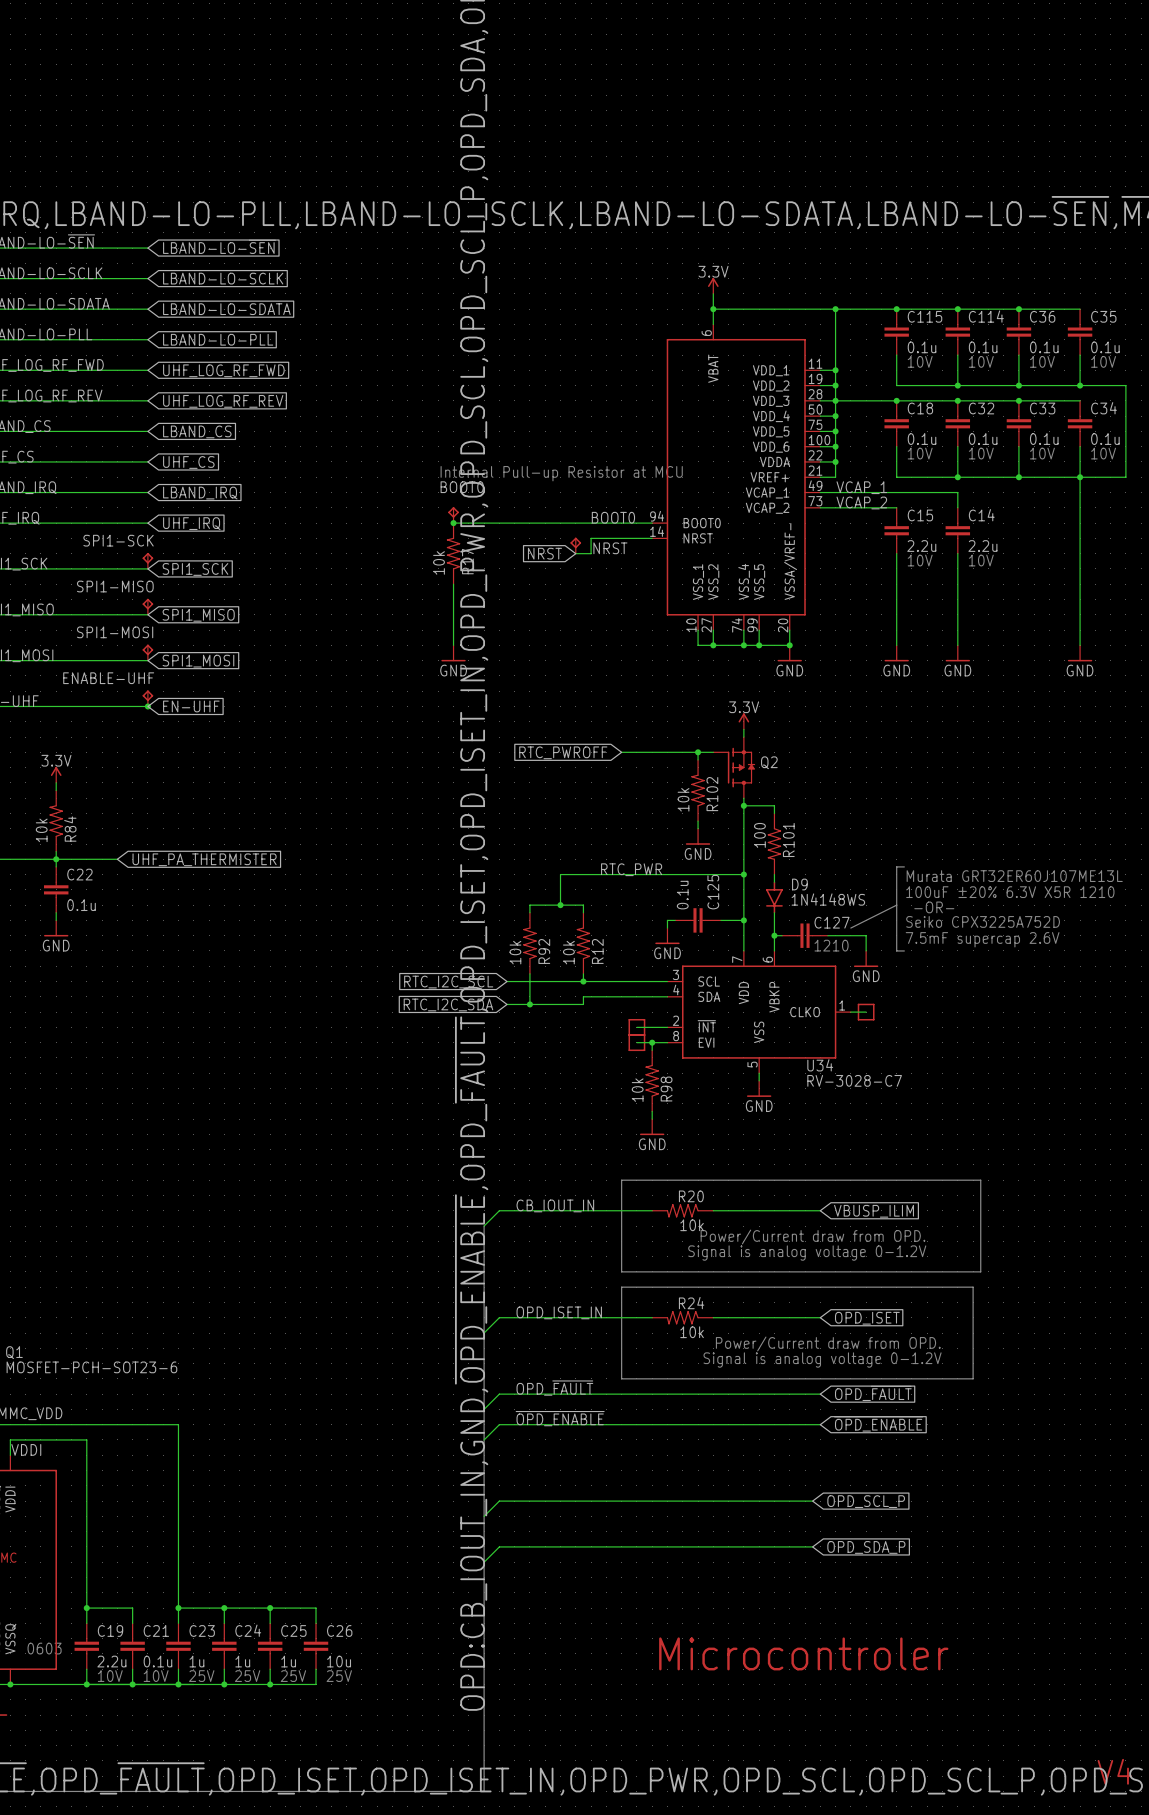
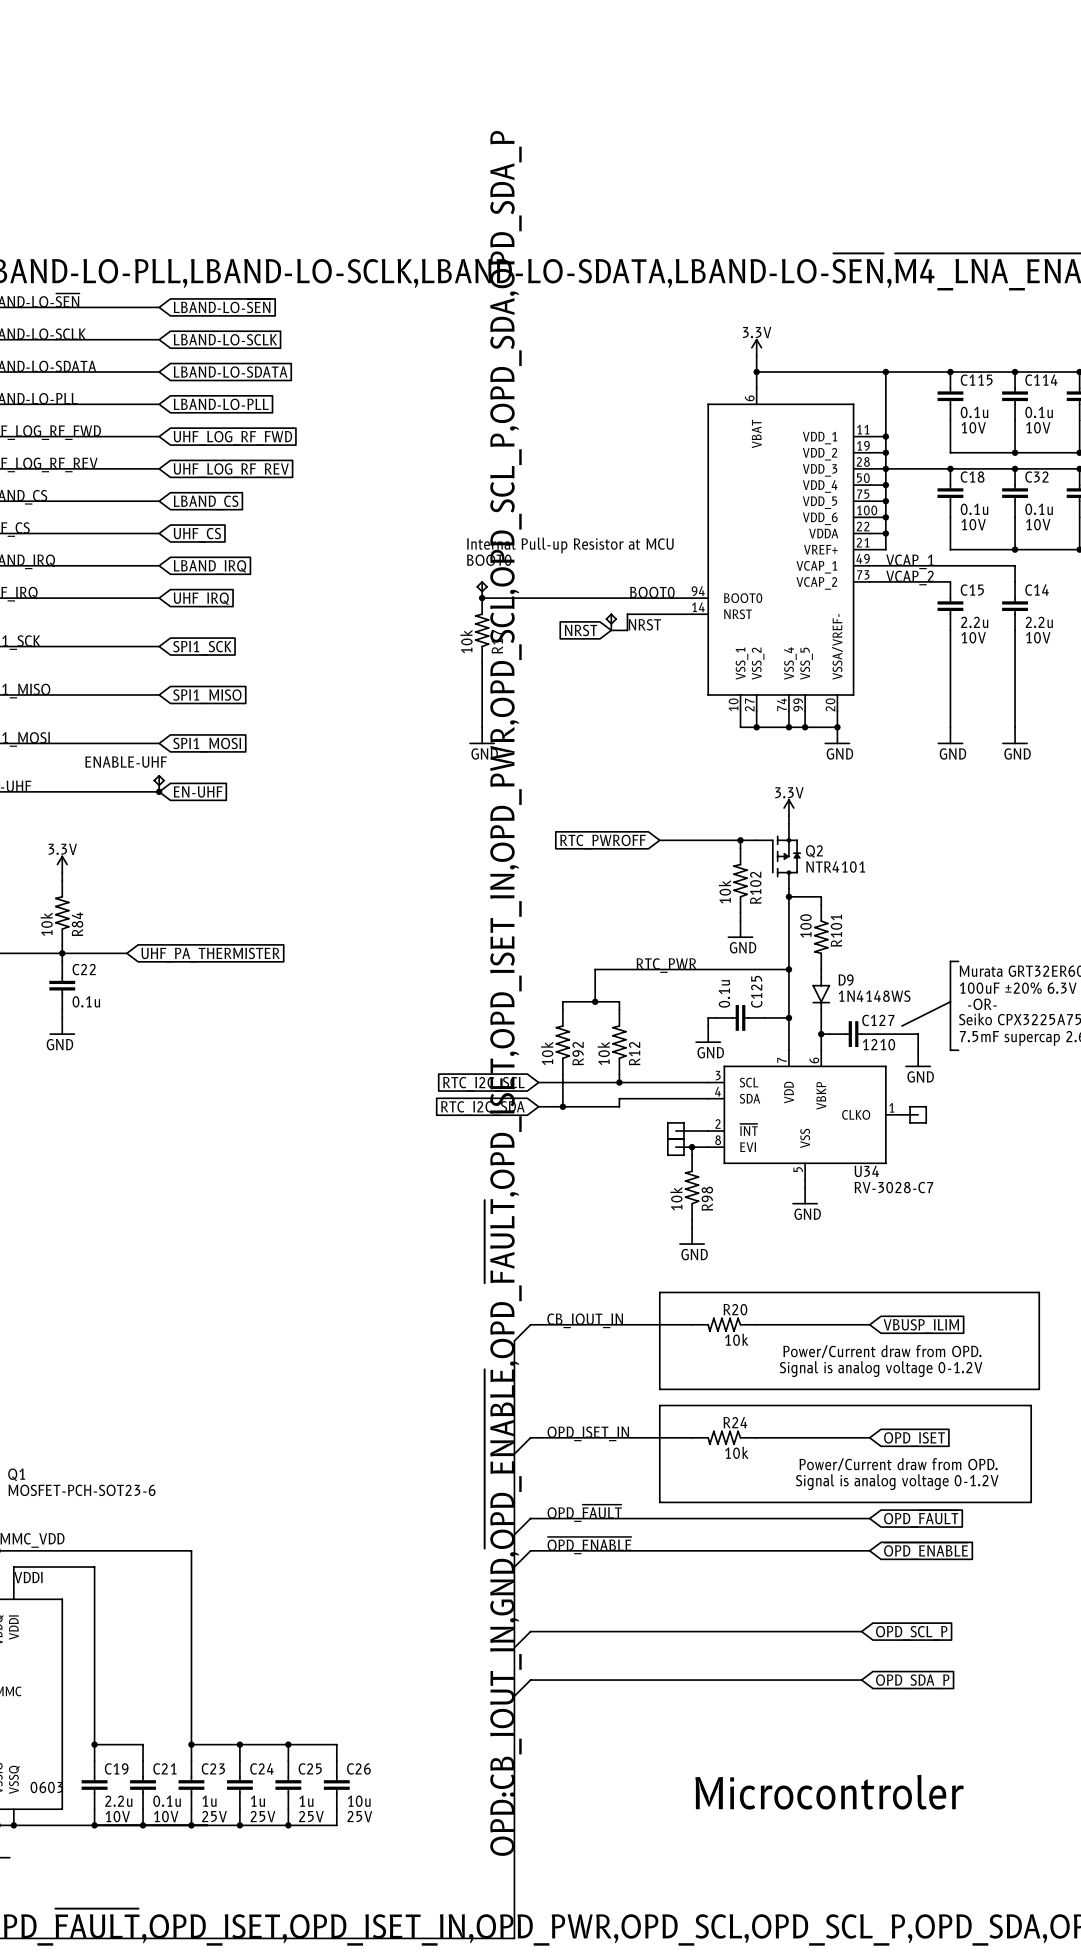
SPI1-SCK: (147, 560) -> none
SPI1-MISO: (147, 606) -> none
SPI1-MOSI: (147, 652) -> none
Q2 value: none -> NTR4101 (835, 867)

